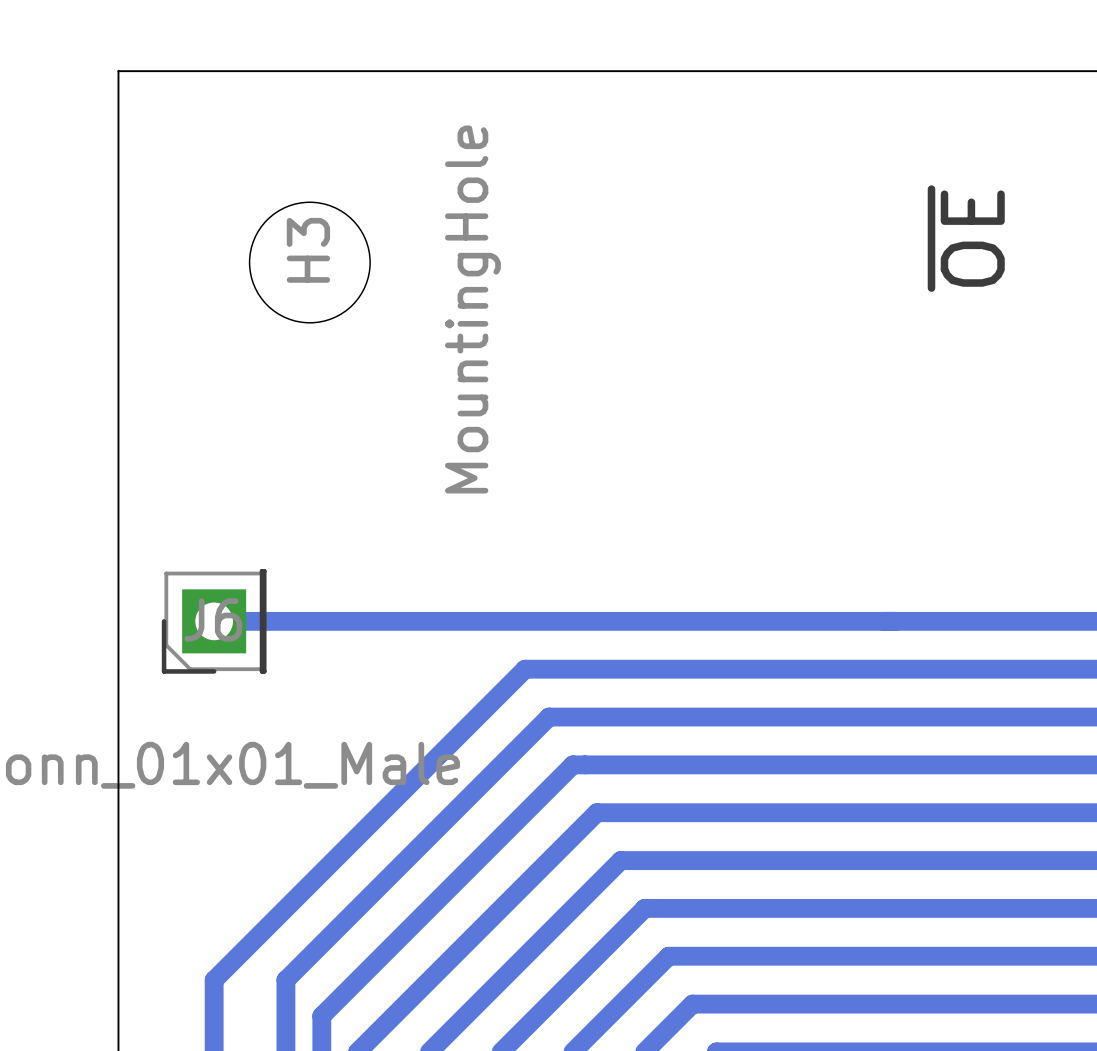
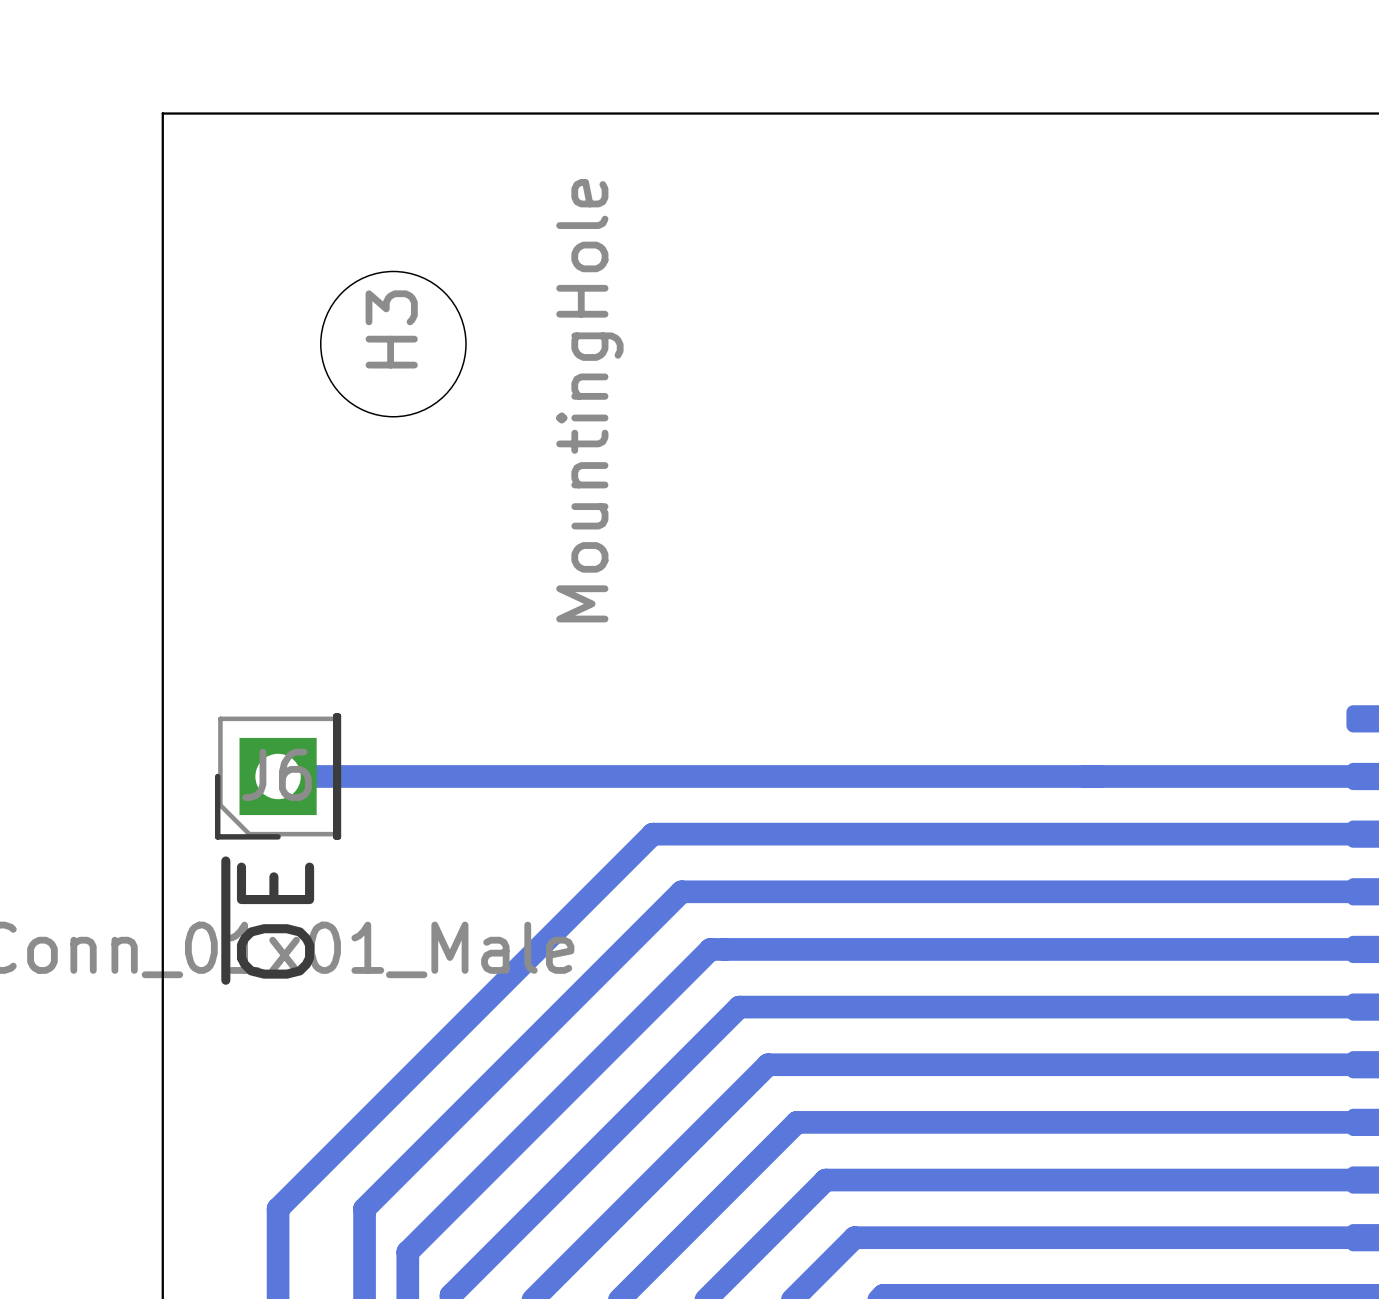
text position: ~{OE} (966, 238) -> ~{OE} (267, 920)

